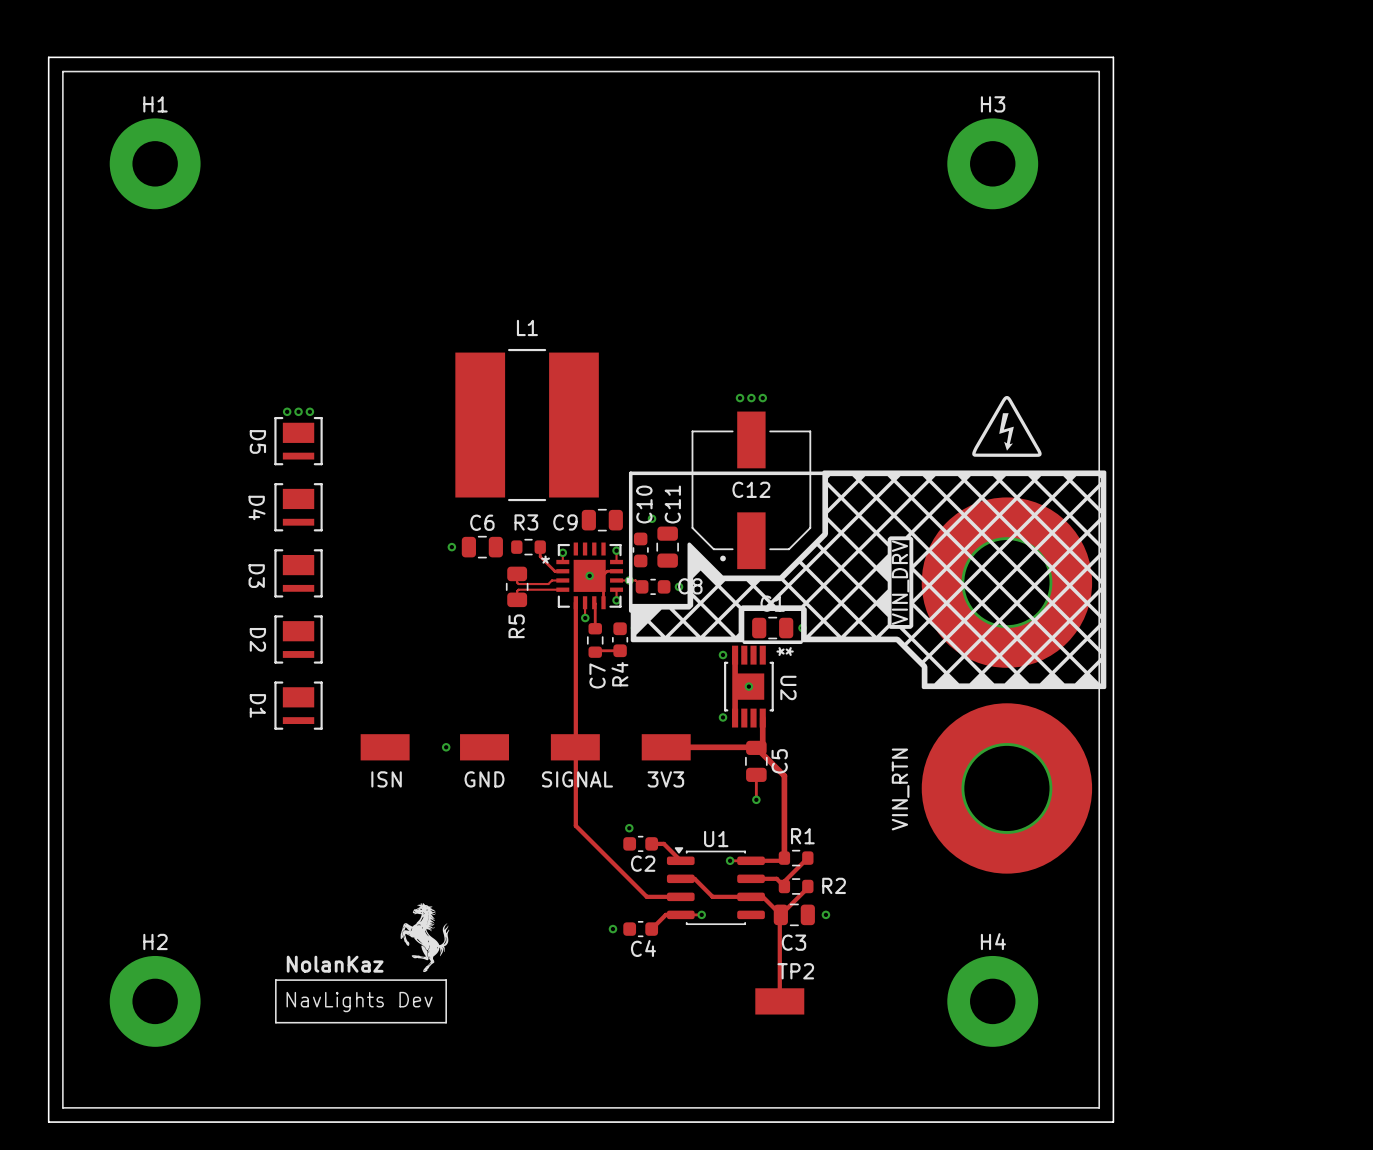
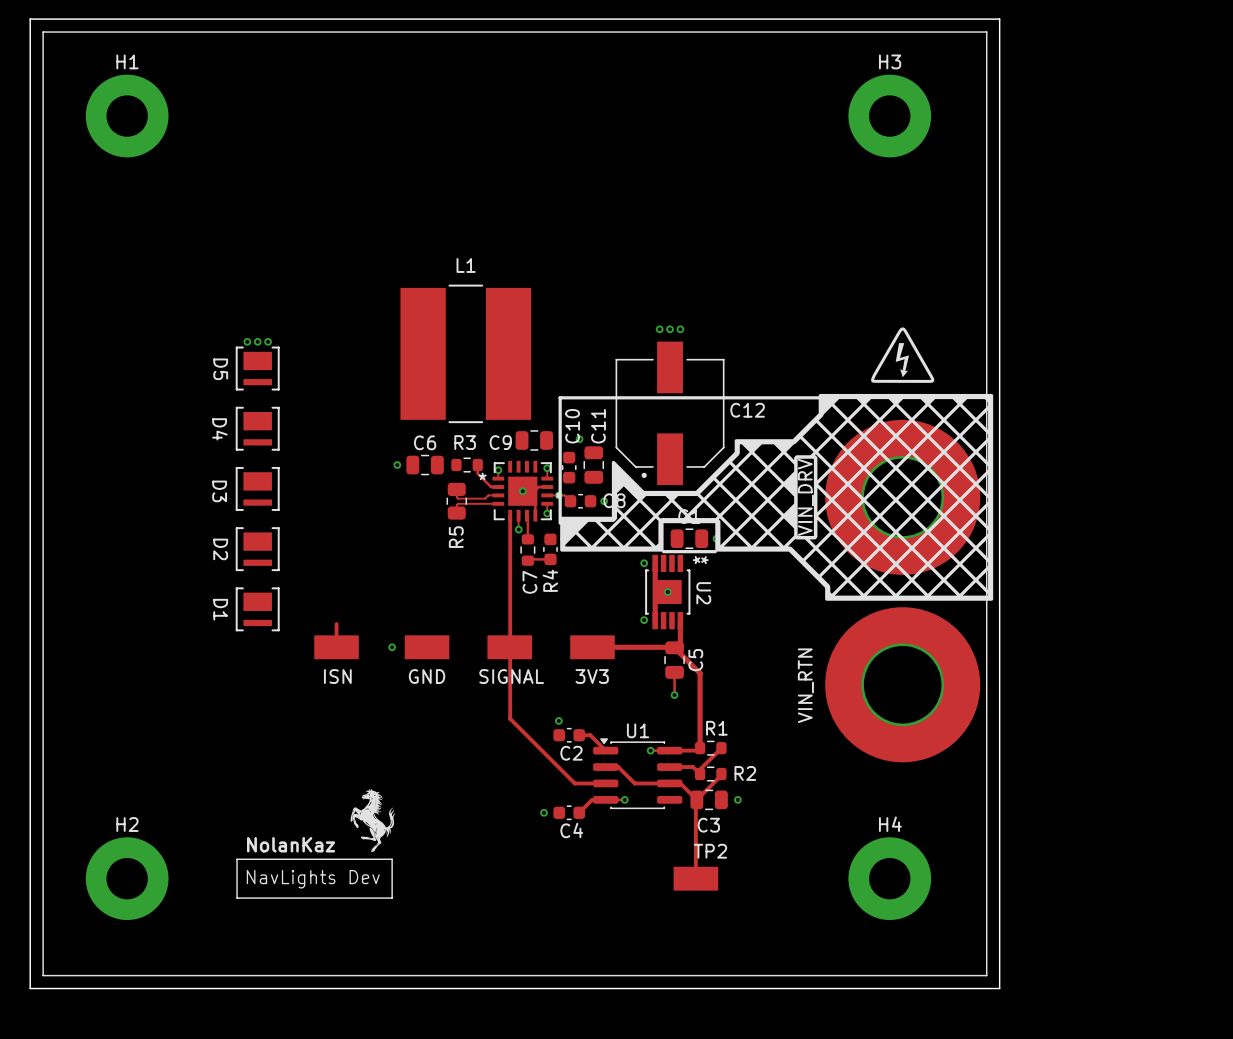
drawing shape: [630, 470, 1107, 690] -> [560, 393, 994, 601]
C12 name position: C12 (751, 489) -> C12 (747, 410)
track: none -> (336, 624) (336, 647)

